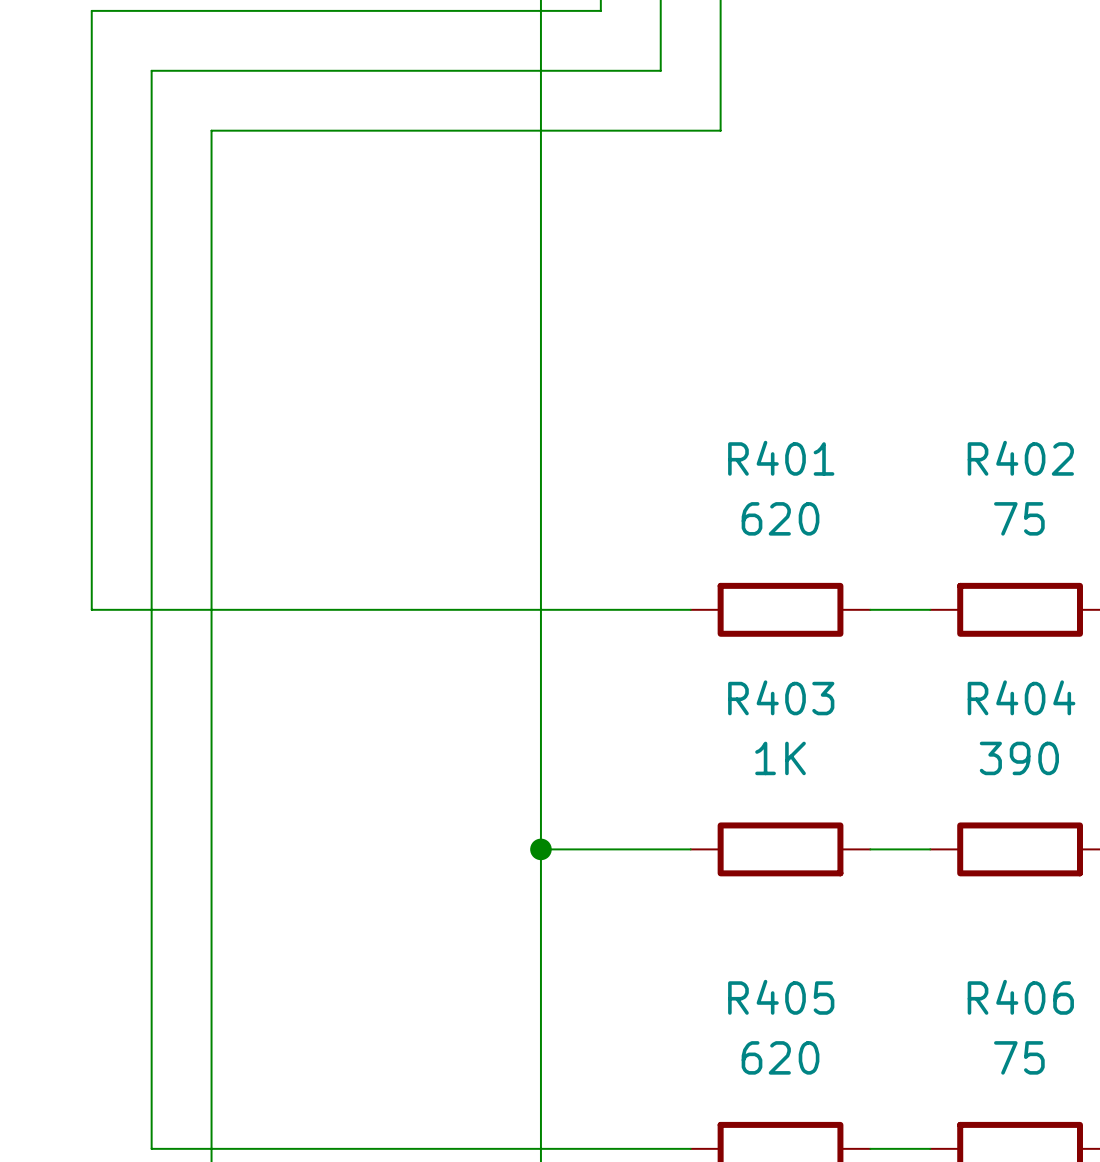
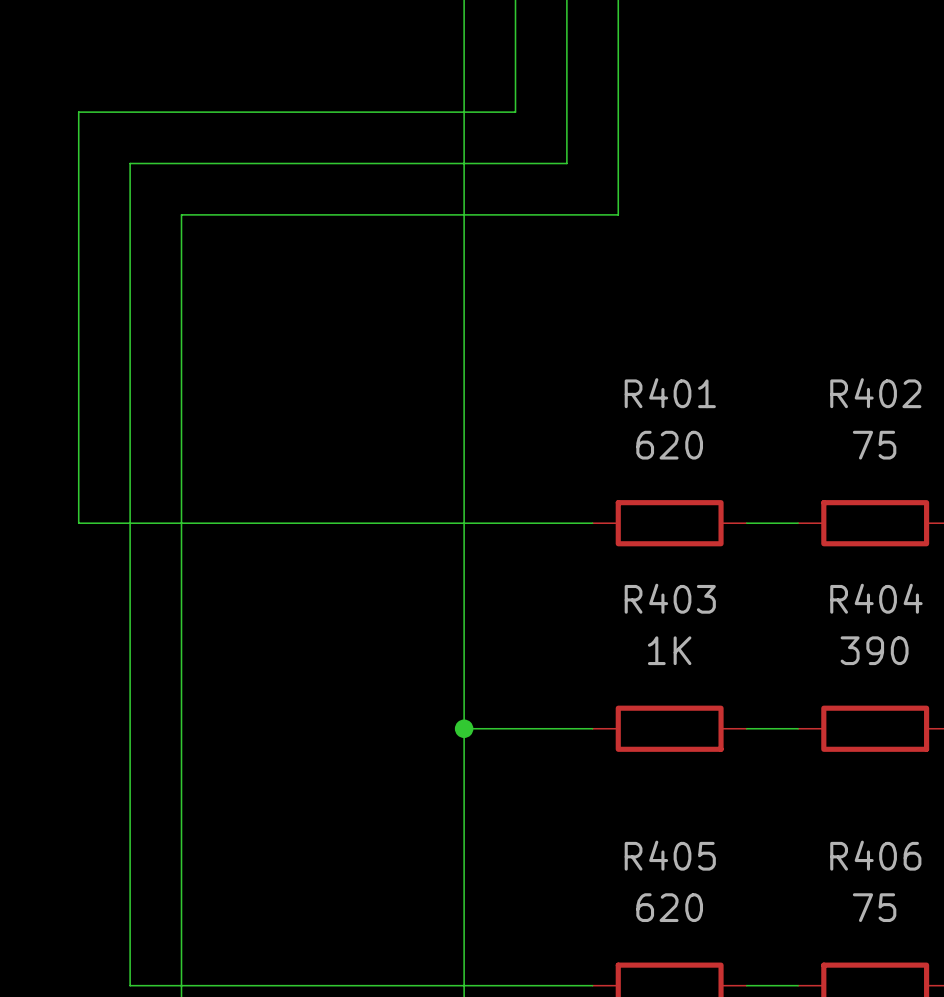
wire: (600, 10) (91, 10) (91, 130) -> none
wire: (660, 70) (151, 70) (151, 190) -> (566, 60) (566, 163) (130, 163)
wire: (211, 130) (211, 250) -> (181, 112) (78, 112)
wire: (600, 130) (720, 130) -> (515, 112) (515, 9)
wire: none -> (618, 112) (618, 214) (181, 214)

